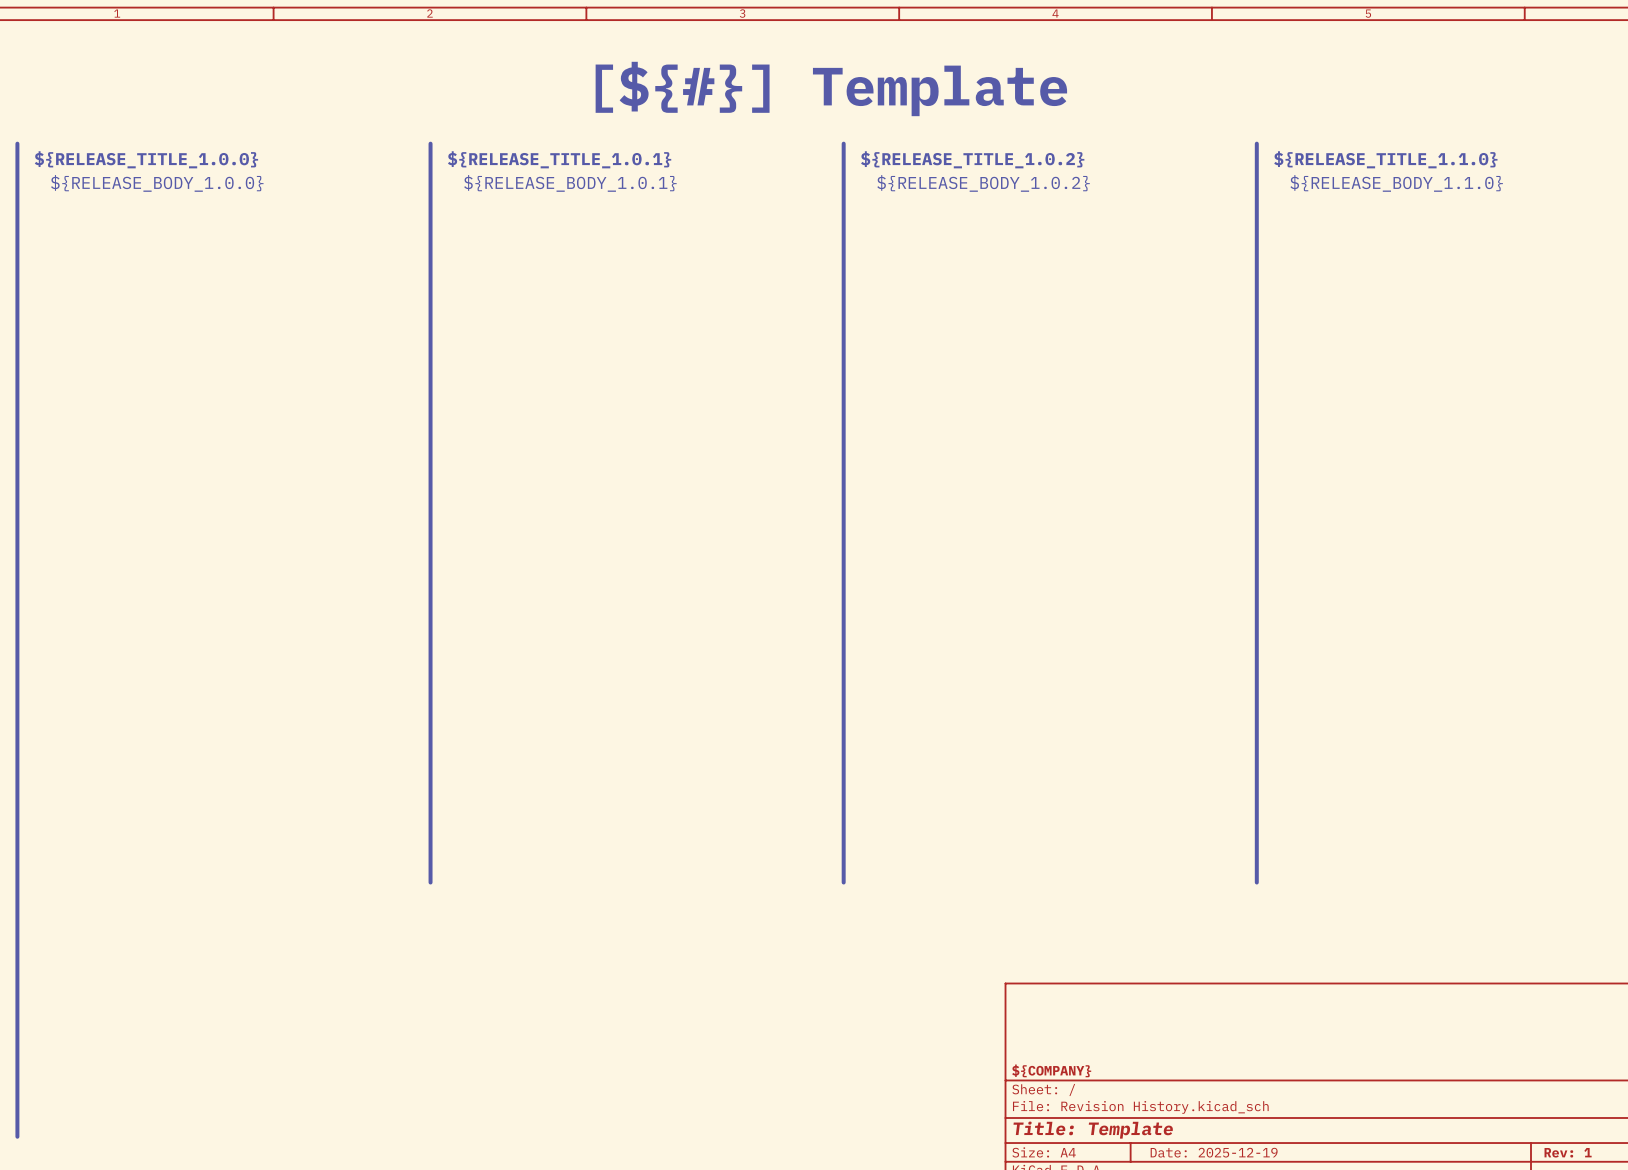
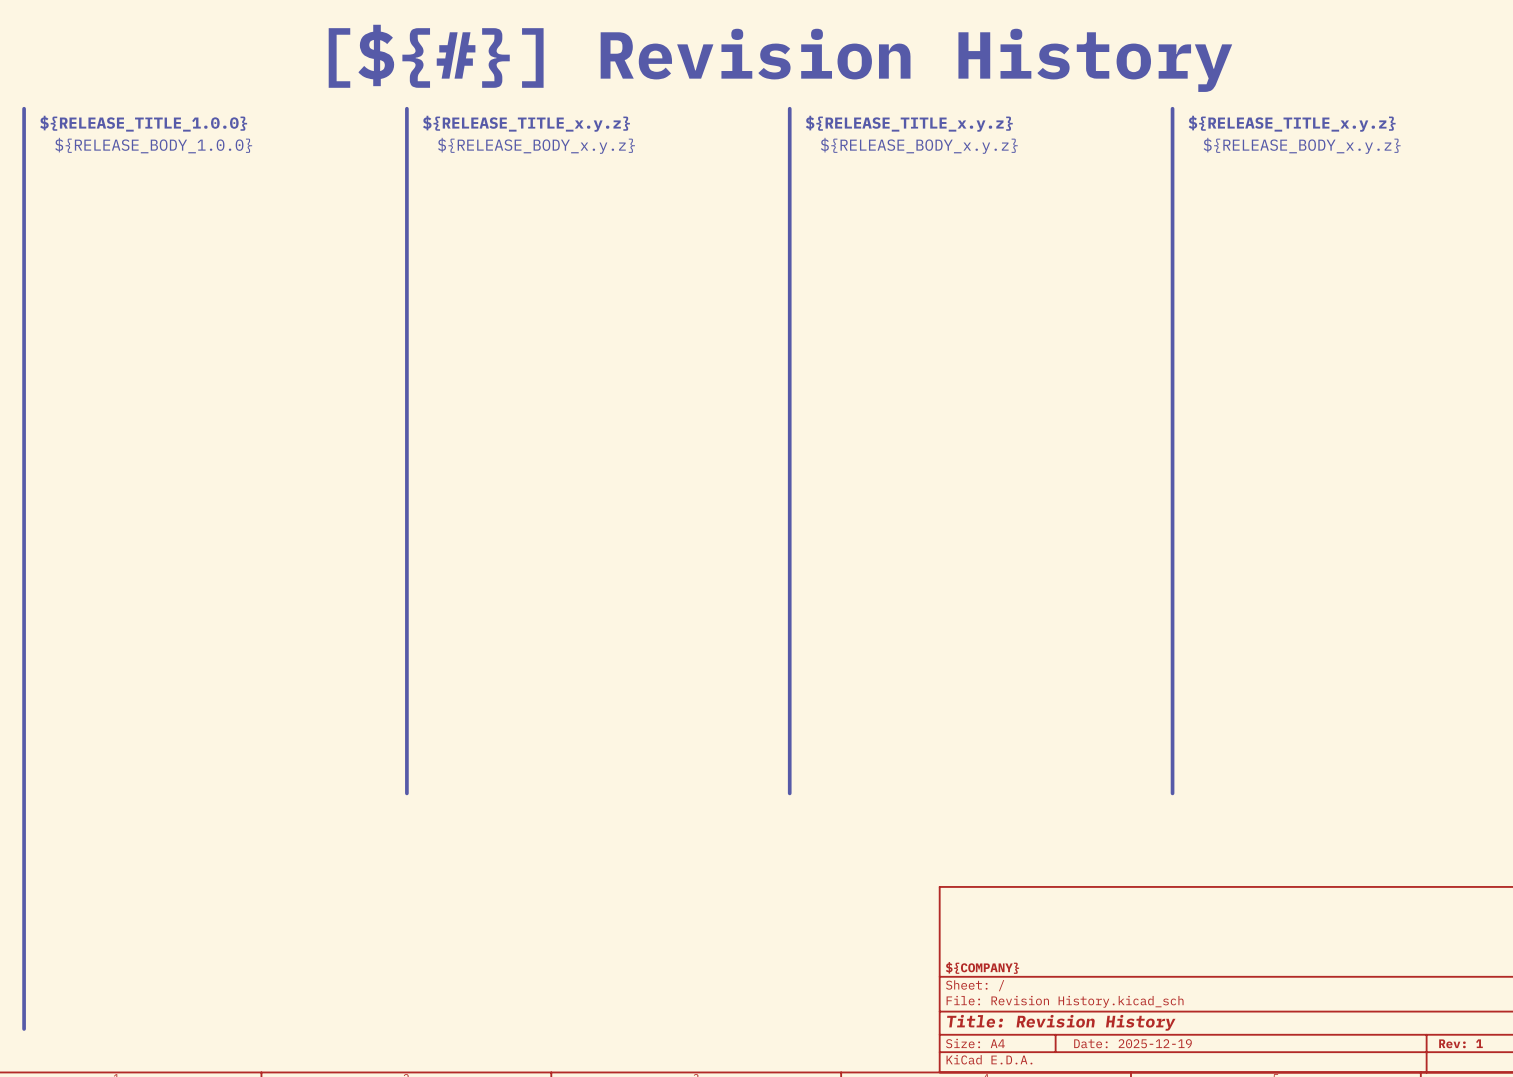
text: [${#}] Template (831, 88) -> [${#}] Revision History (780, 58)
text: ${RELEASE_TITLE_1.0.1} (559, 159) -> ${RELEASE_TITLE_x.y.z} (526, 123)
text: ${RELEASE_TITLE_1.0.2} (972, 159) -> ${RELEASE_TITLE_x.y.z} (909, 123)
text: ${RELEASE_TITLE_1.1.0} (1385, 159) -> ${RELEASE_TITLE_x.y.z} (1292, 123)
text: ${RELEASE_BODY_1.0.1} (570, 183) -> ${RELEASE_BODY_x.y.z} (536, 145)
text: ${RELEASE_BODY_1.0.2} (983, 183) -> ${RELEASE_BODY_x.y.z} (919, 145)
text: ${RELEASE_BODY_1.1.0} (1396, 183) -> ${RELEASE_BODY_x.y.z} (1302, 145)
title block: Title: Template (1093, 1130) -> Title: Revision History (1061, 1022)

